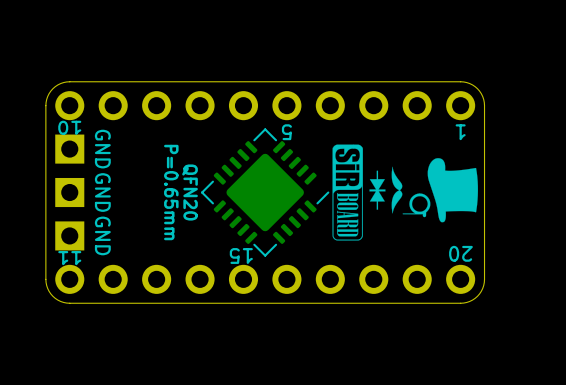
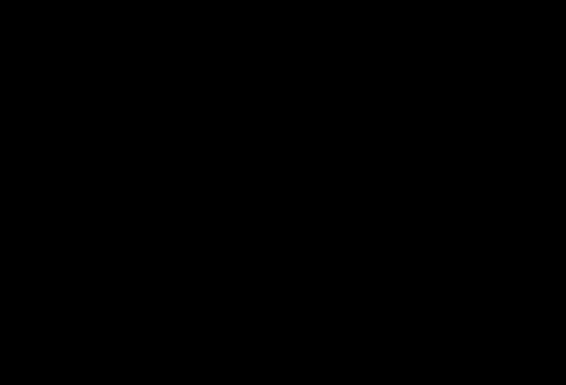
board edge: (460, 81) (69, 81) (57, 84) (49, 93) (45, 105) (45, 279) (49, 291) (57, 300) (69, 303) (460, 303) (472, 300) (481, 291) (484, 279) (484, 105) (482, 96) (477, 88) (469, 83) (460, 81) -> none
part: (265, 105) -> none
text: 10 (69, 127) -> none
text: 5 (286, 132) -> none
text: 1 (460, 132) -> none
drawing: [332, 144, 479, 241] -> none
text: GND (102, 149) -> none
part: (69, 192) -> none
text: GND (102, 192) -> none
text: P=0.65mm (171, 192) -> none
text: QFN20 (190, 192) -> none
part: (265, 192) -> none
text: GND (102, 235) -> none
text: 20 (460, 253) -> none
text: 15 (241, 256) -> none
text: 11 (69, 258) -> none
part: (265, 279) -> none

